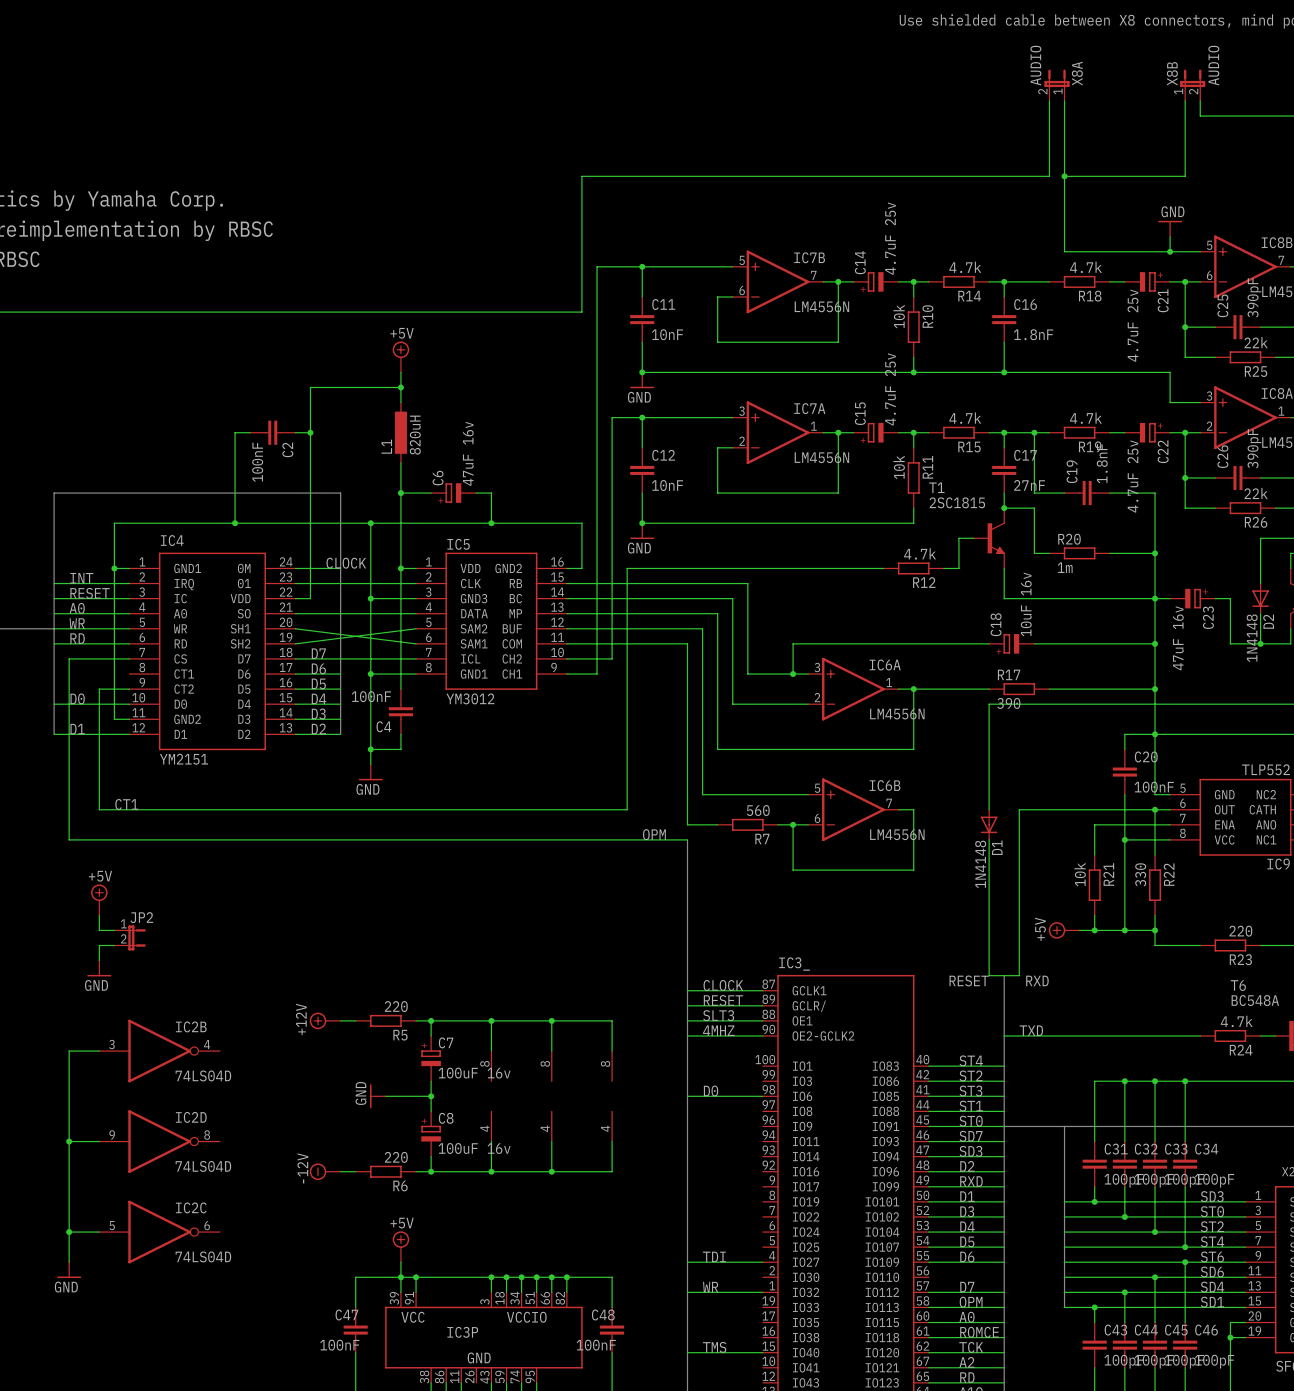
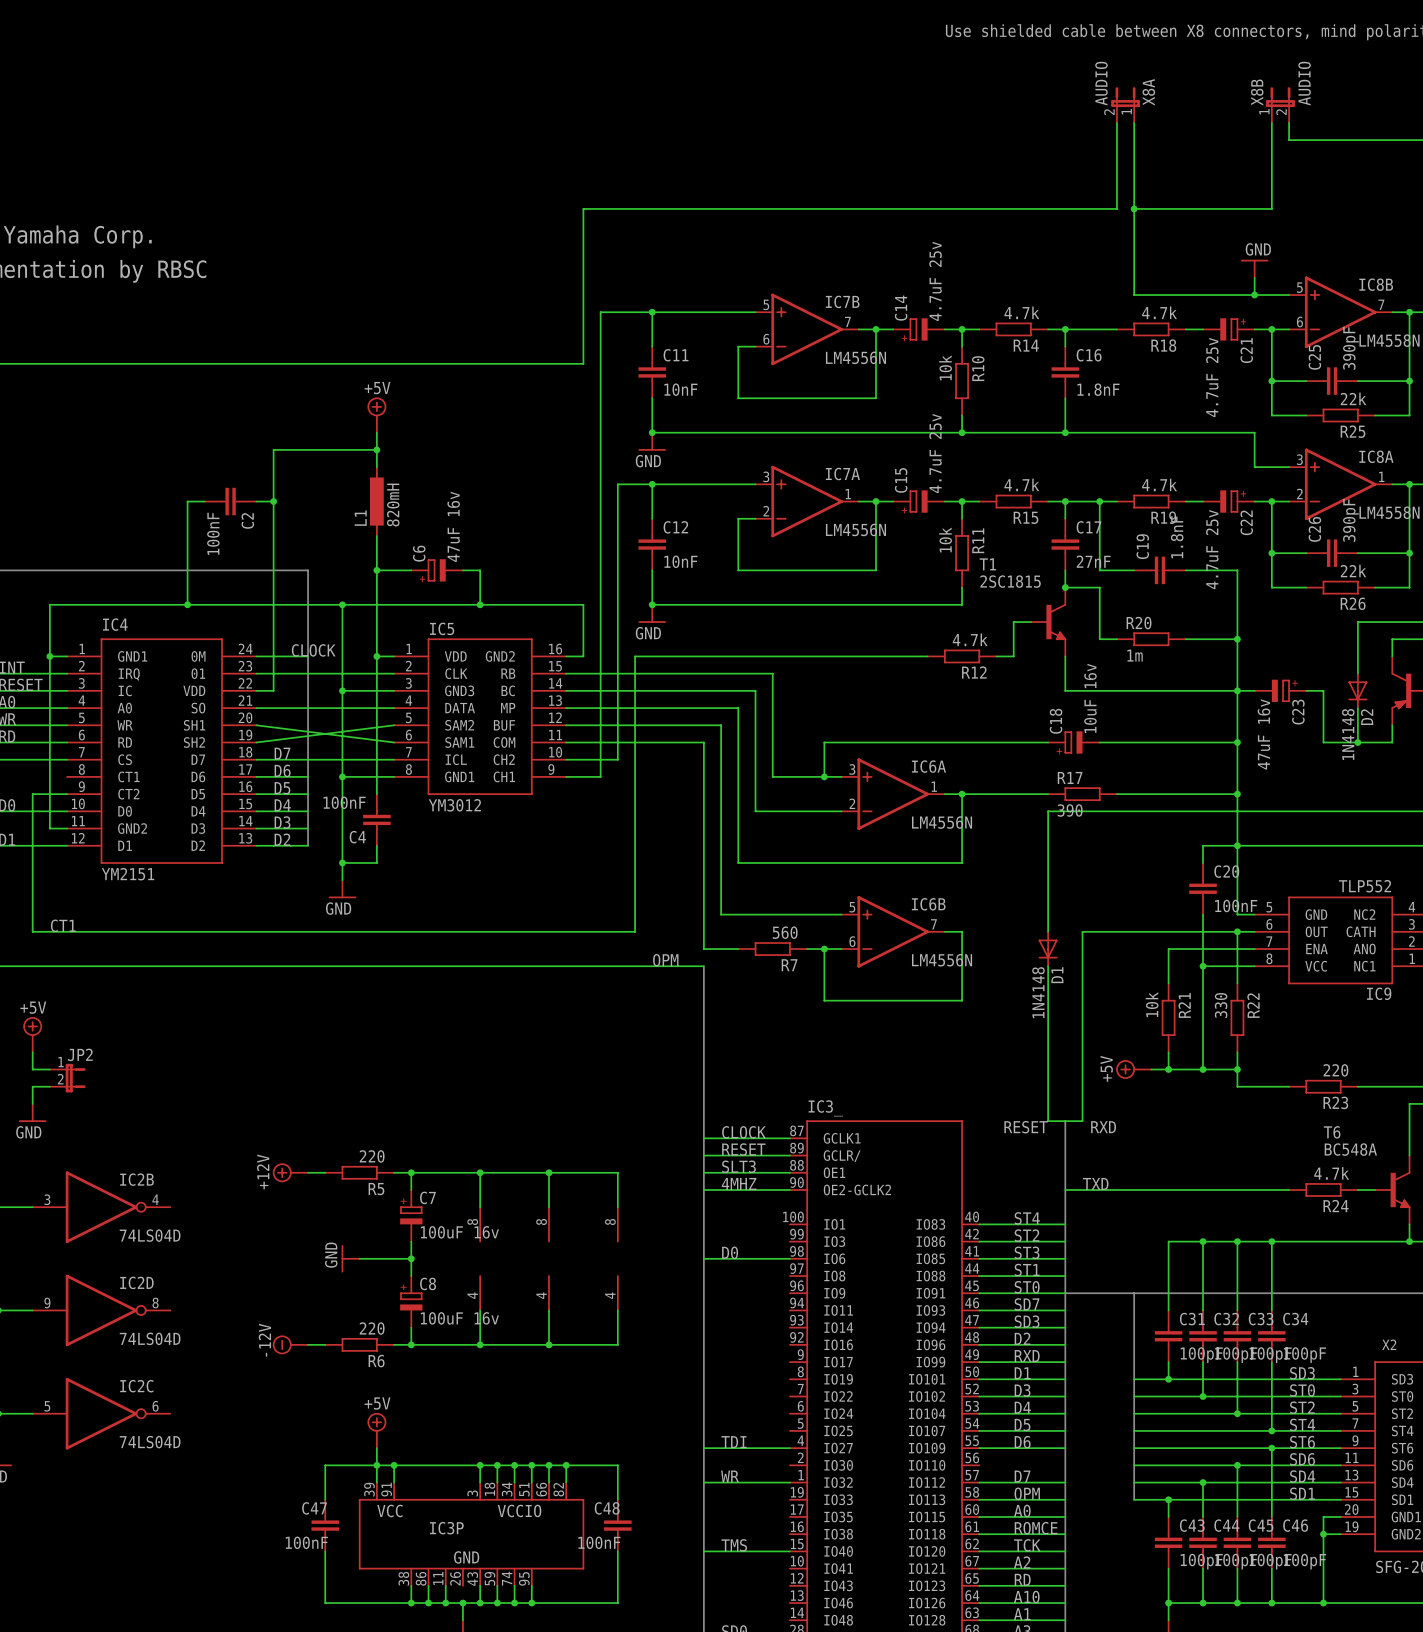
L1 value: 820uH (415, 435) -> 820mH (393, 505)

